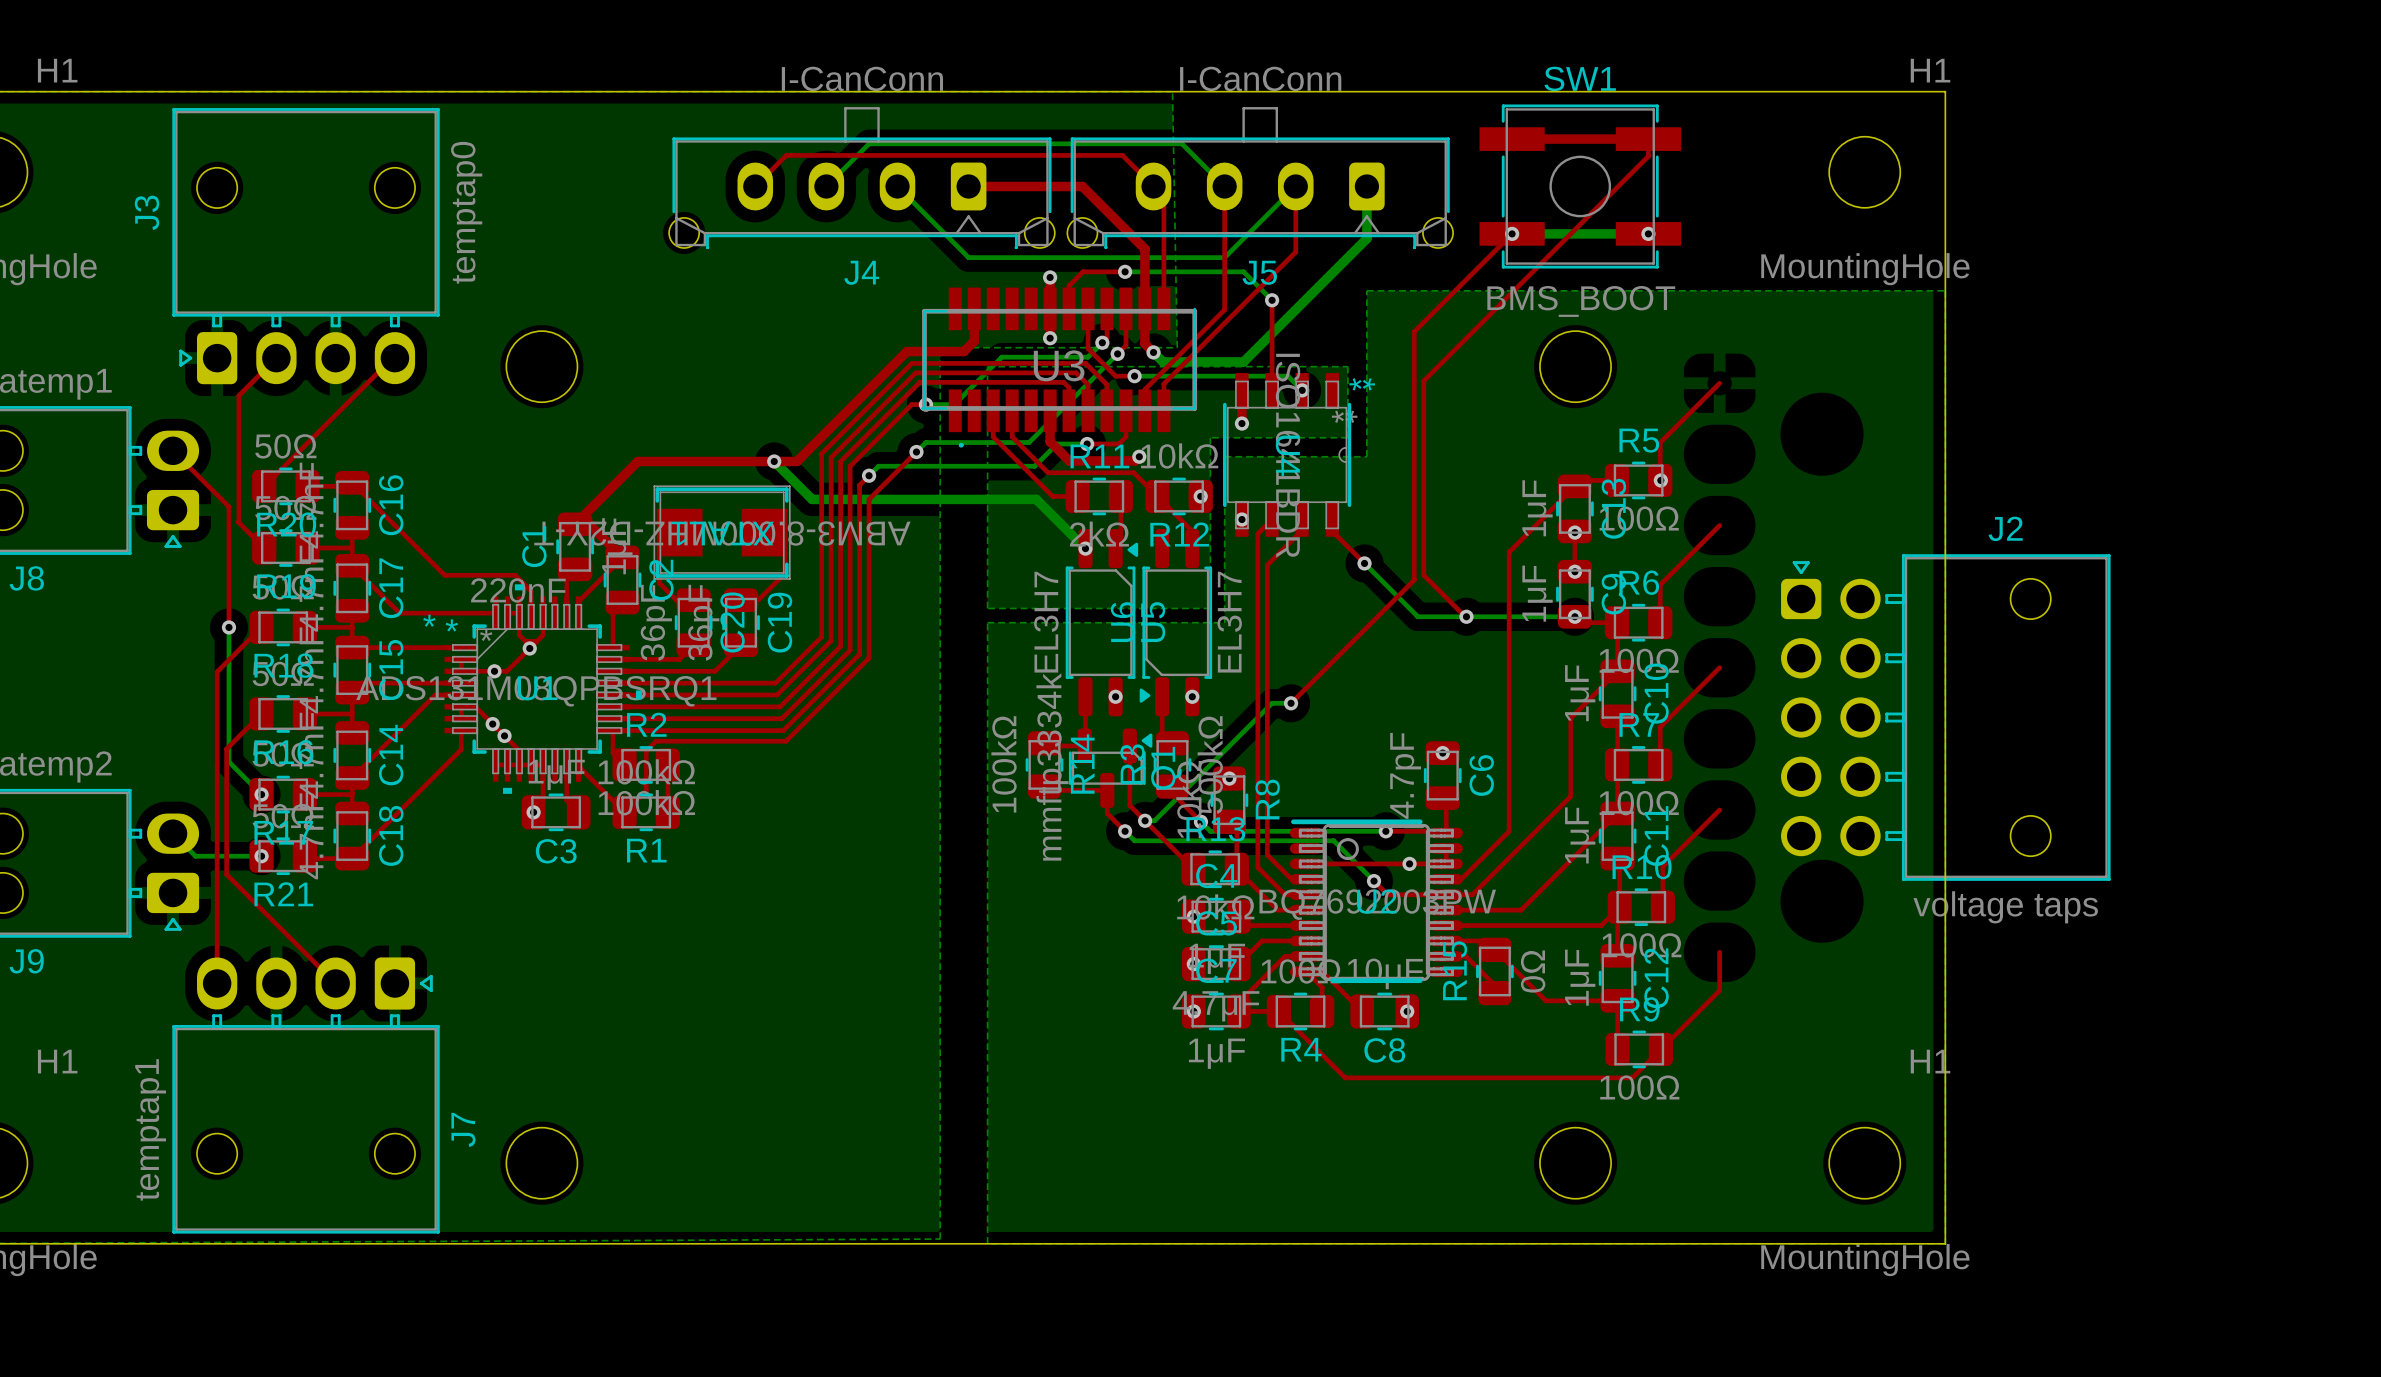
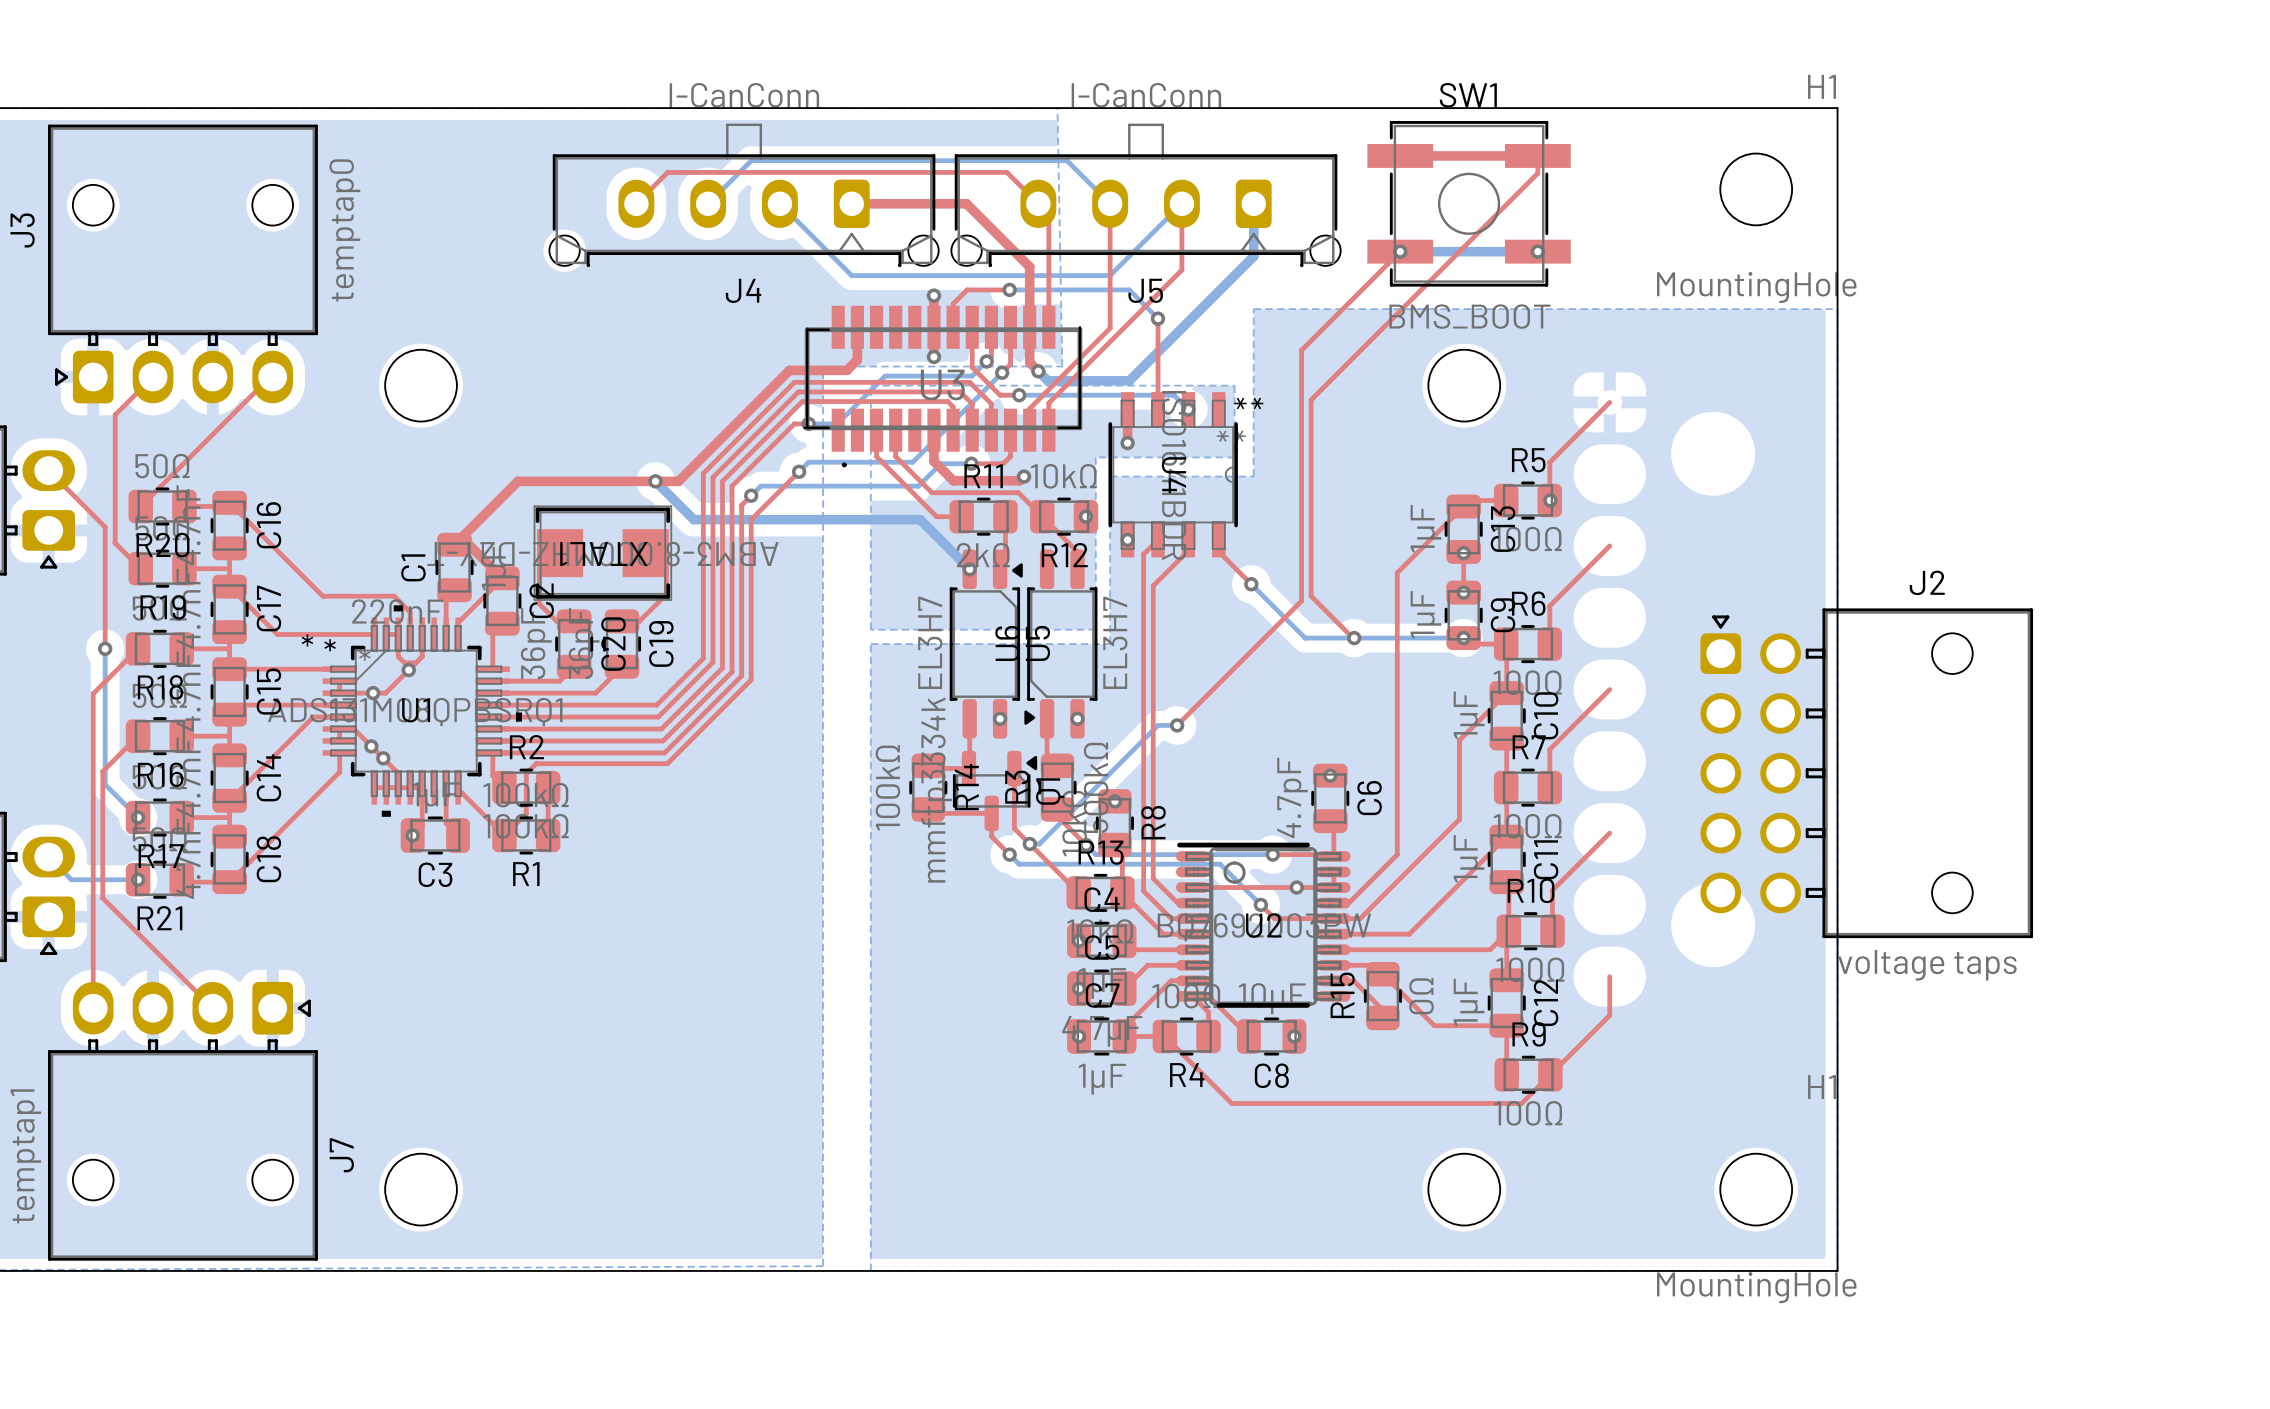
J2 position: (1945, 717) -> (1866, 773)

